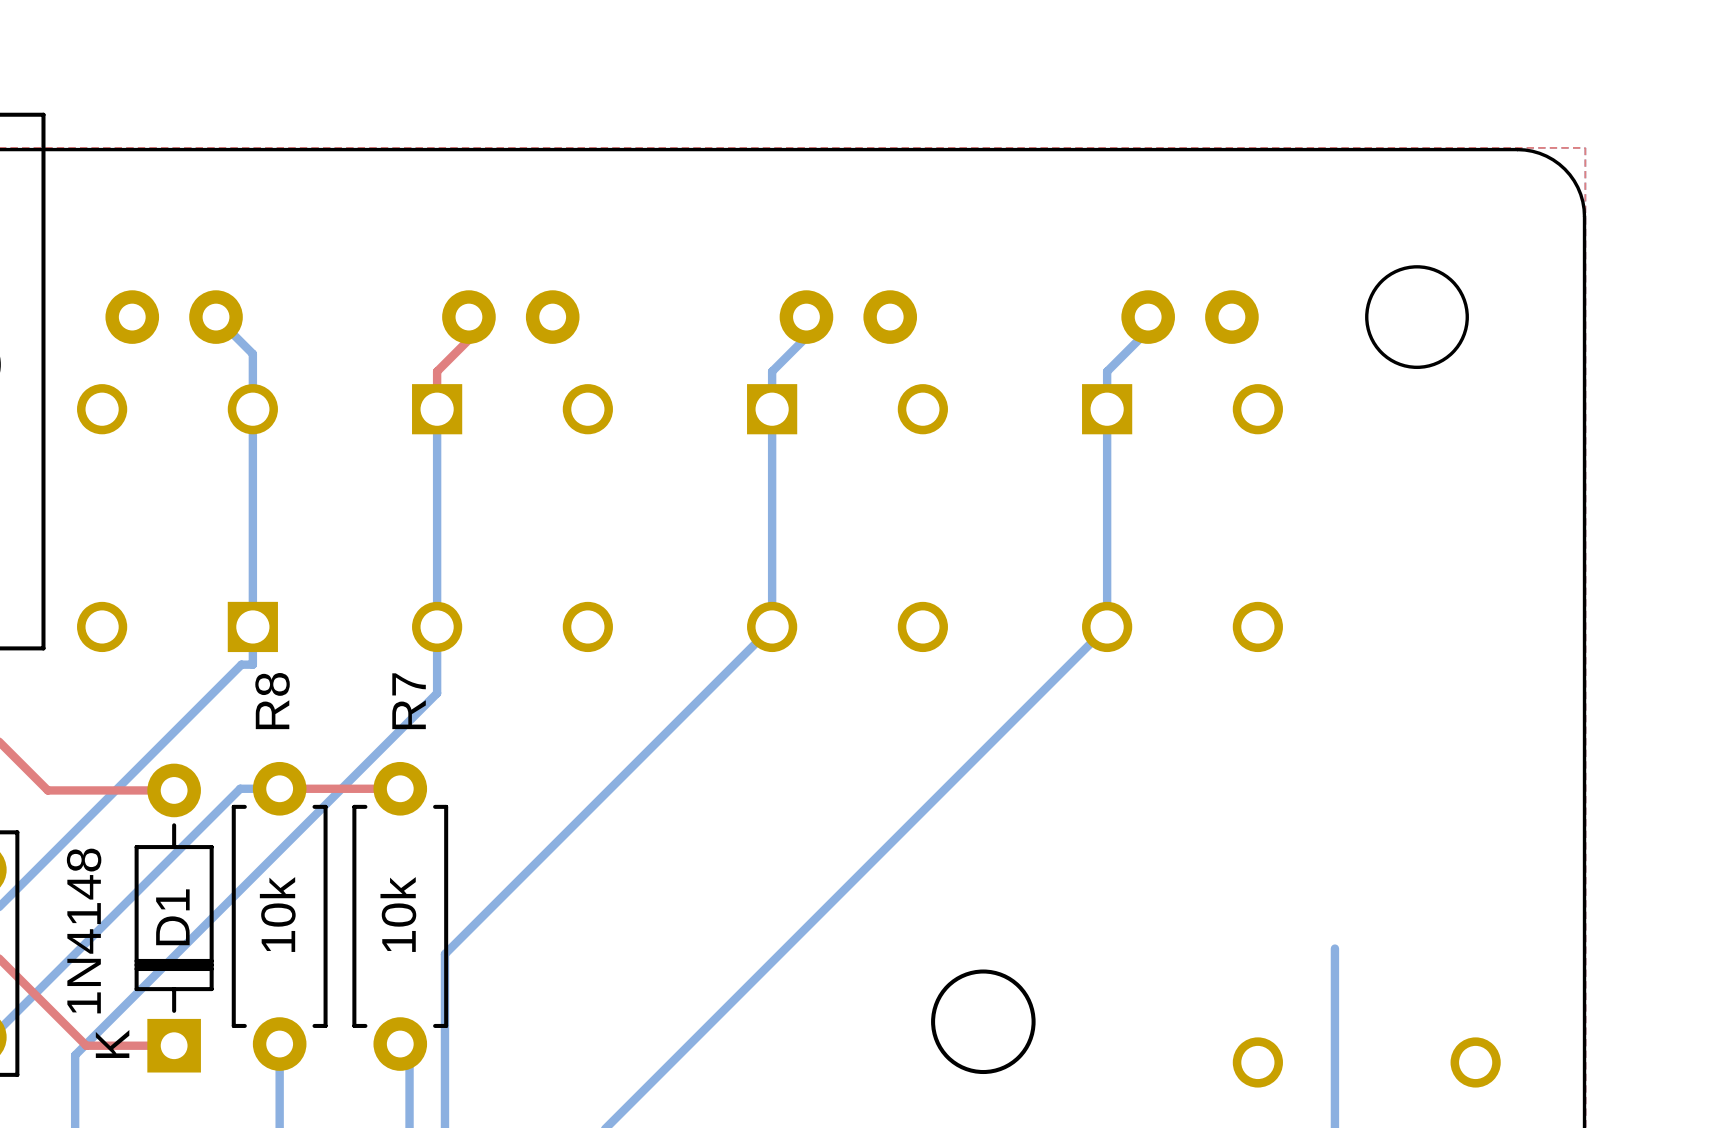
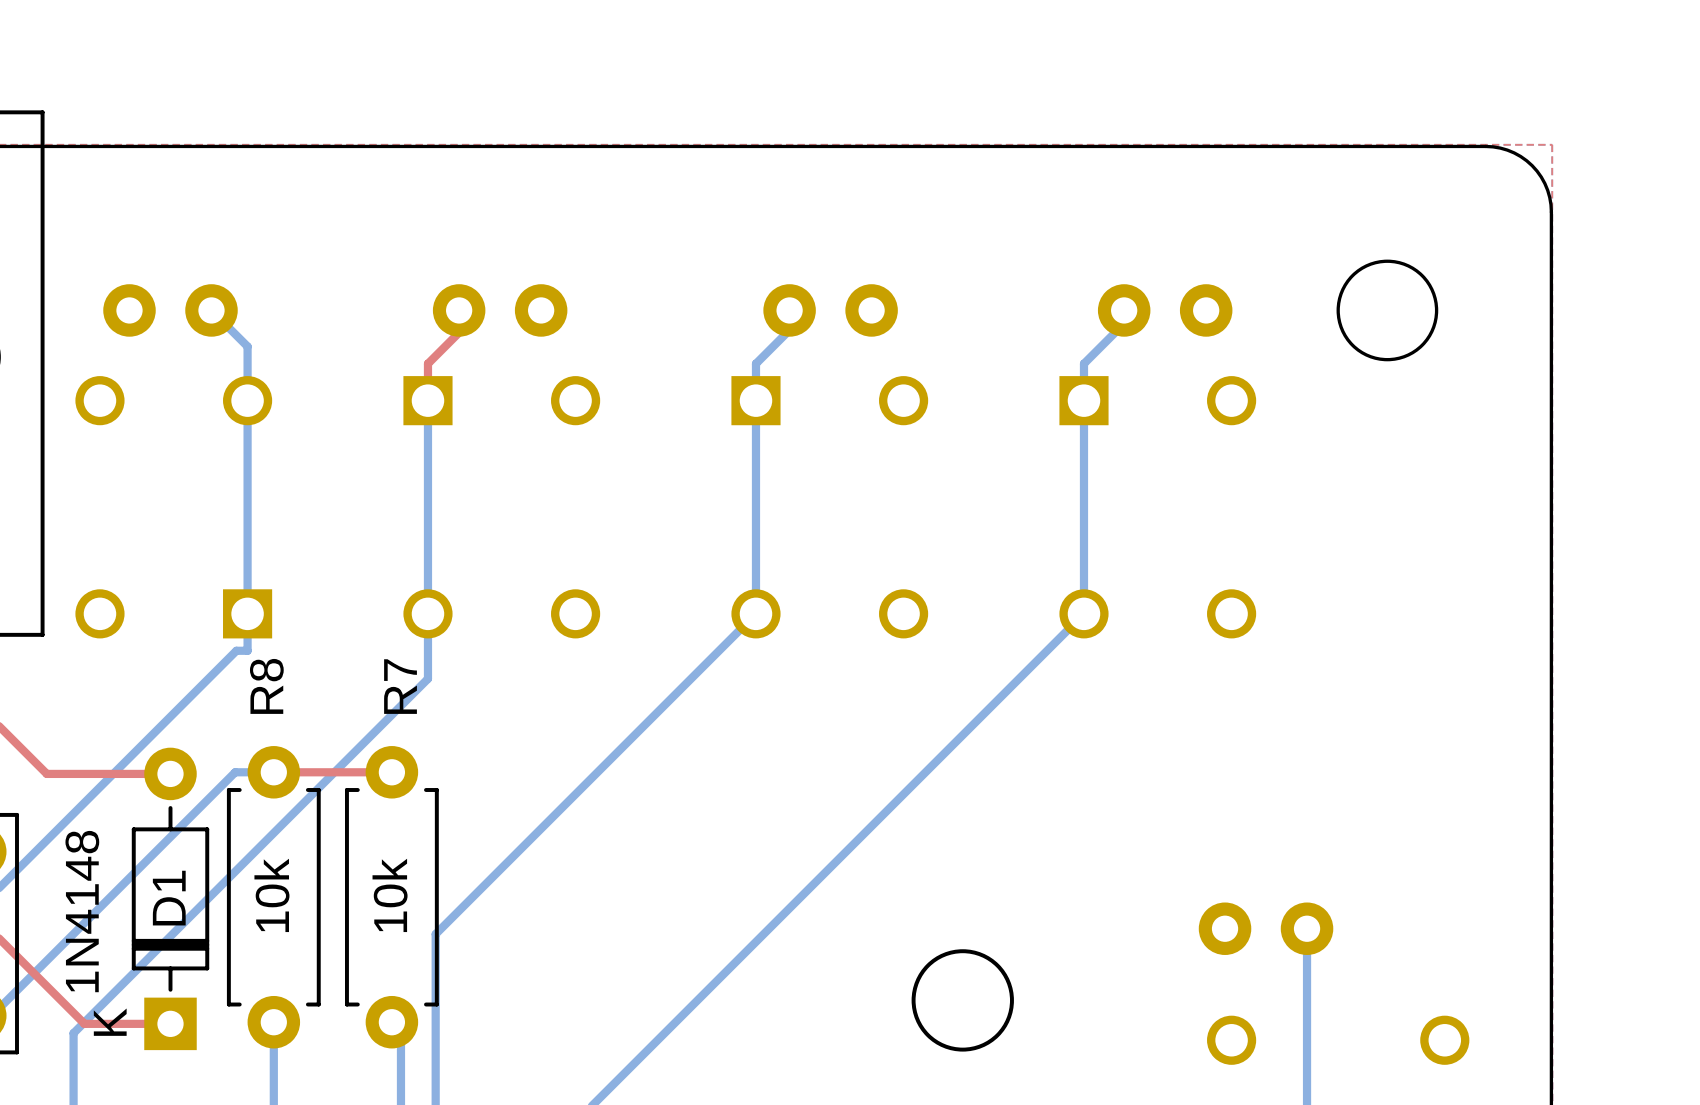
part: none -> (1266, 928)

